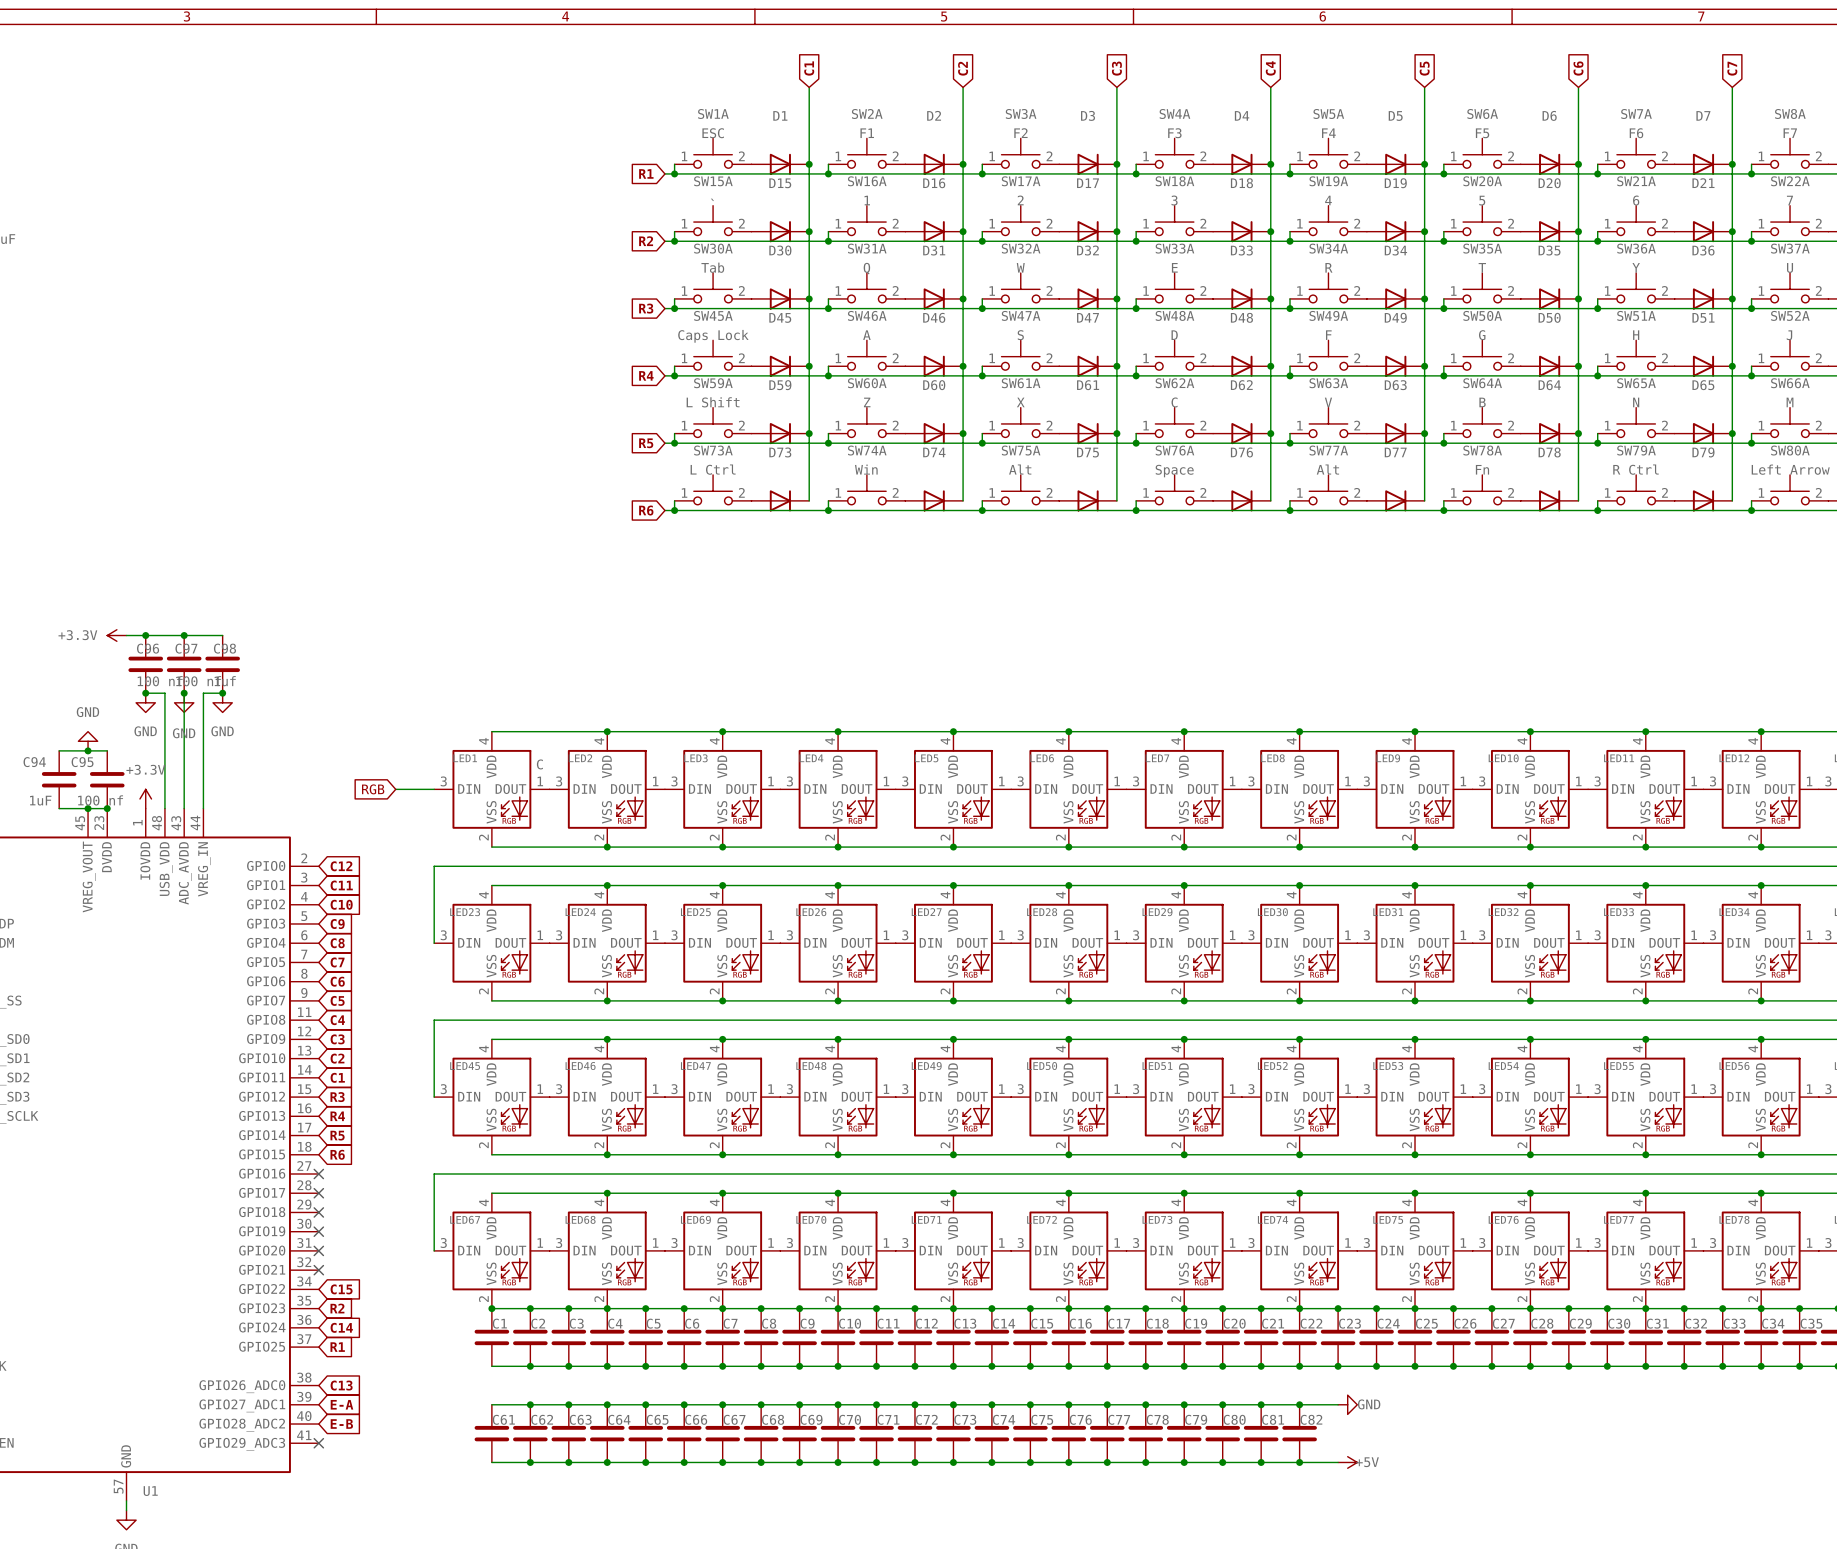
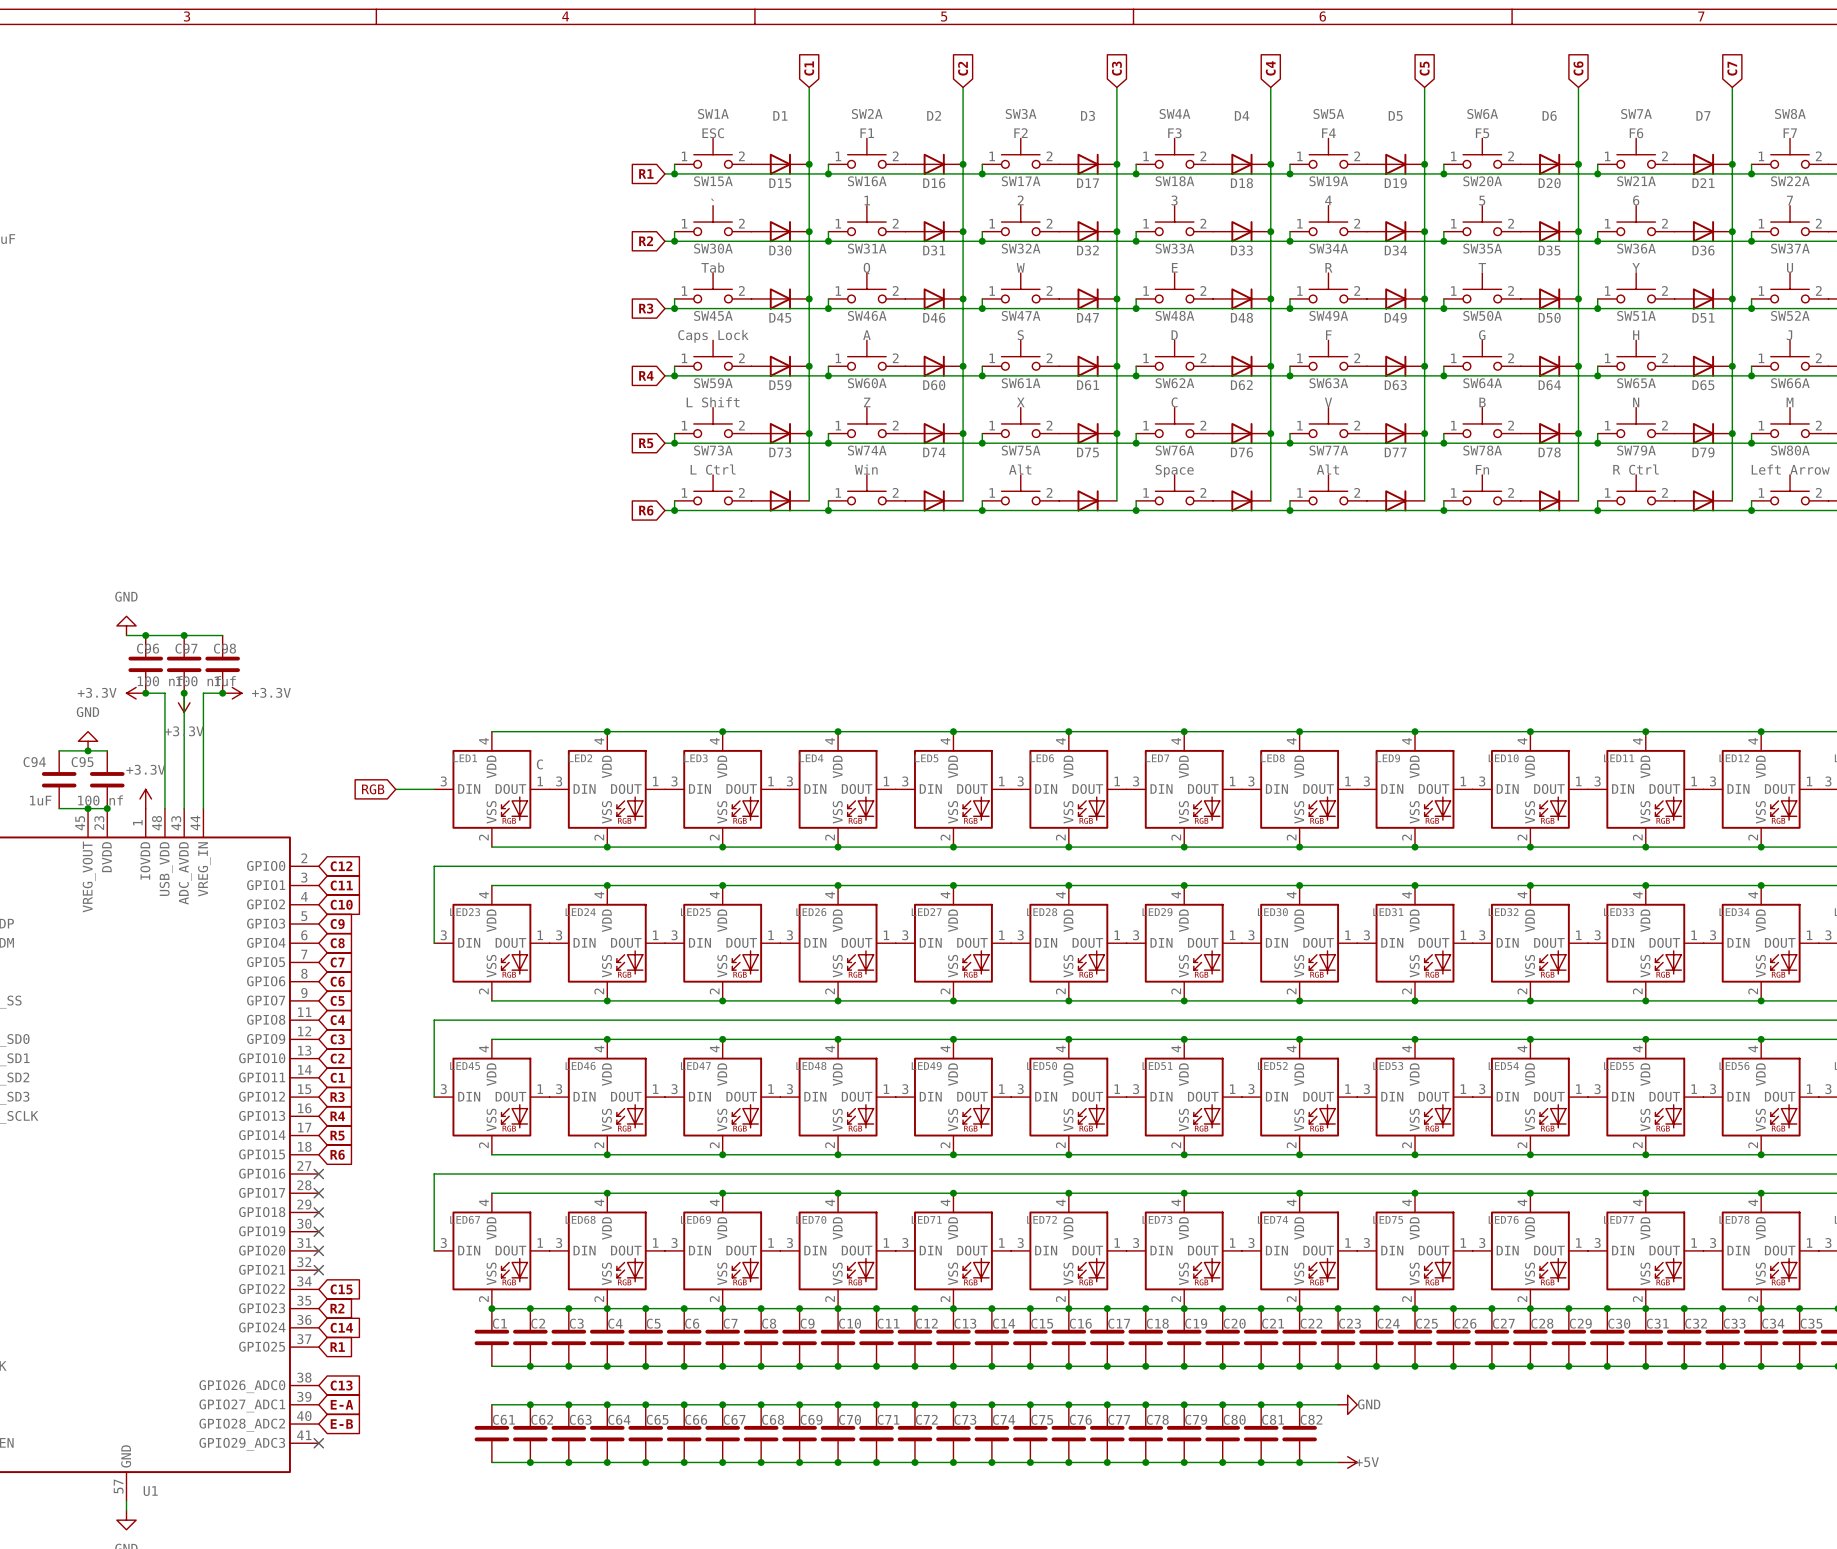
power symbol: none -> GND (126, 625)
power symbol position: +3.3V (116, 635) -> +3.3V (136, 693)
power symbol: none -> +3.3V (232, 693)
power symbol: GND (145, 702) -> none
power symbol: GND (184, 702) -> +3.3V (184, 702)
power symbol: GND (222, 702) -> none

